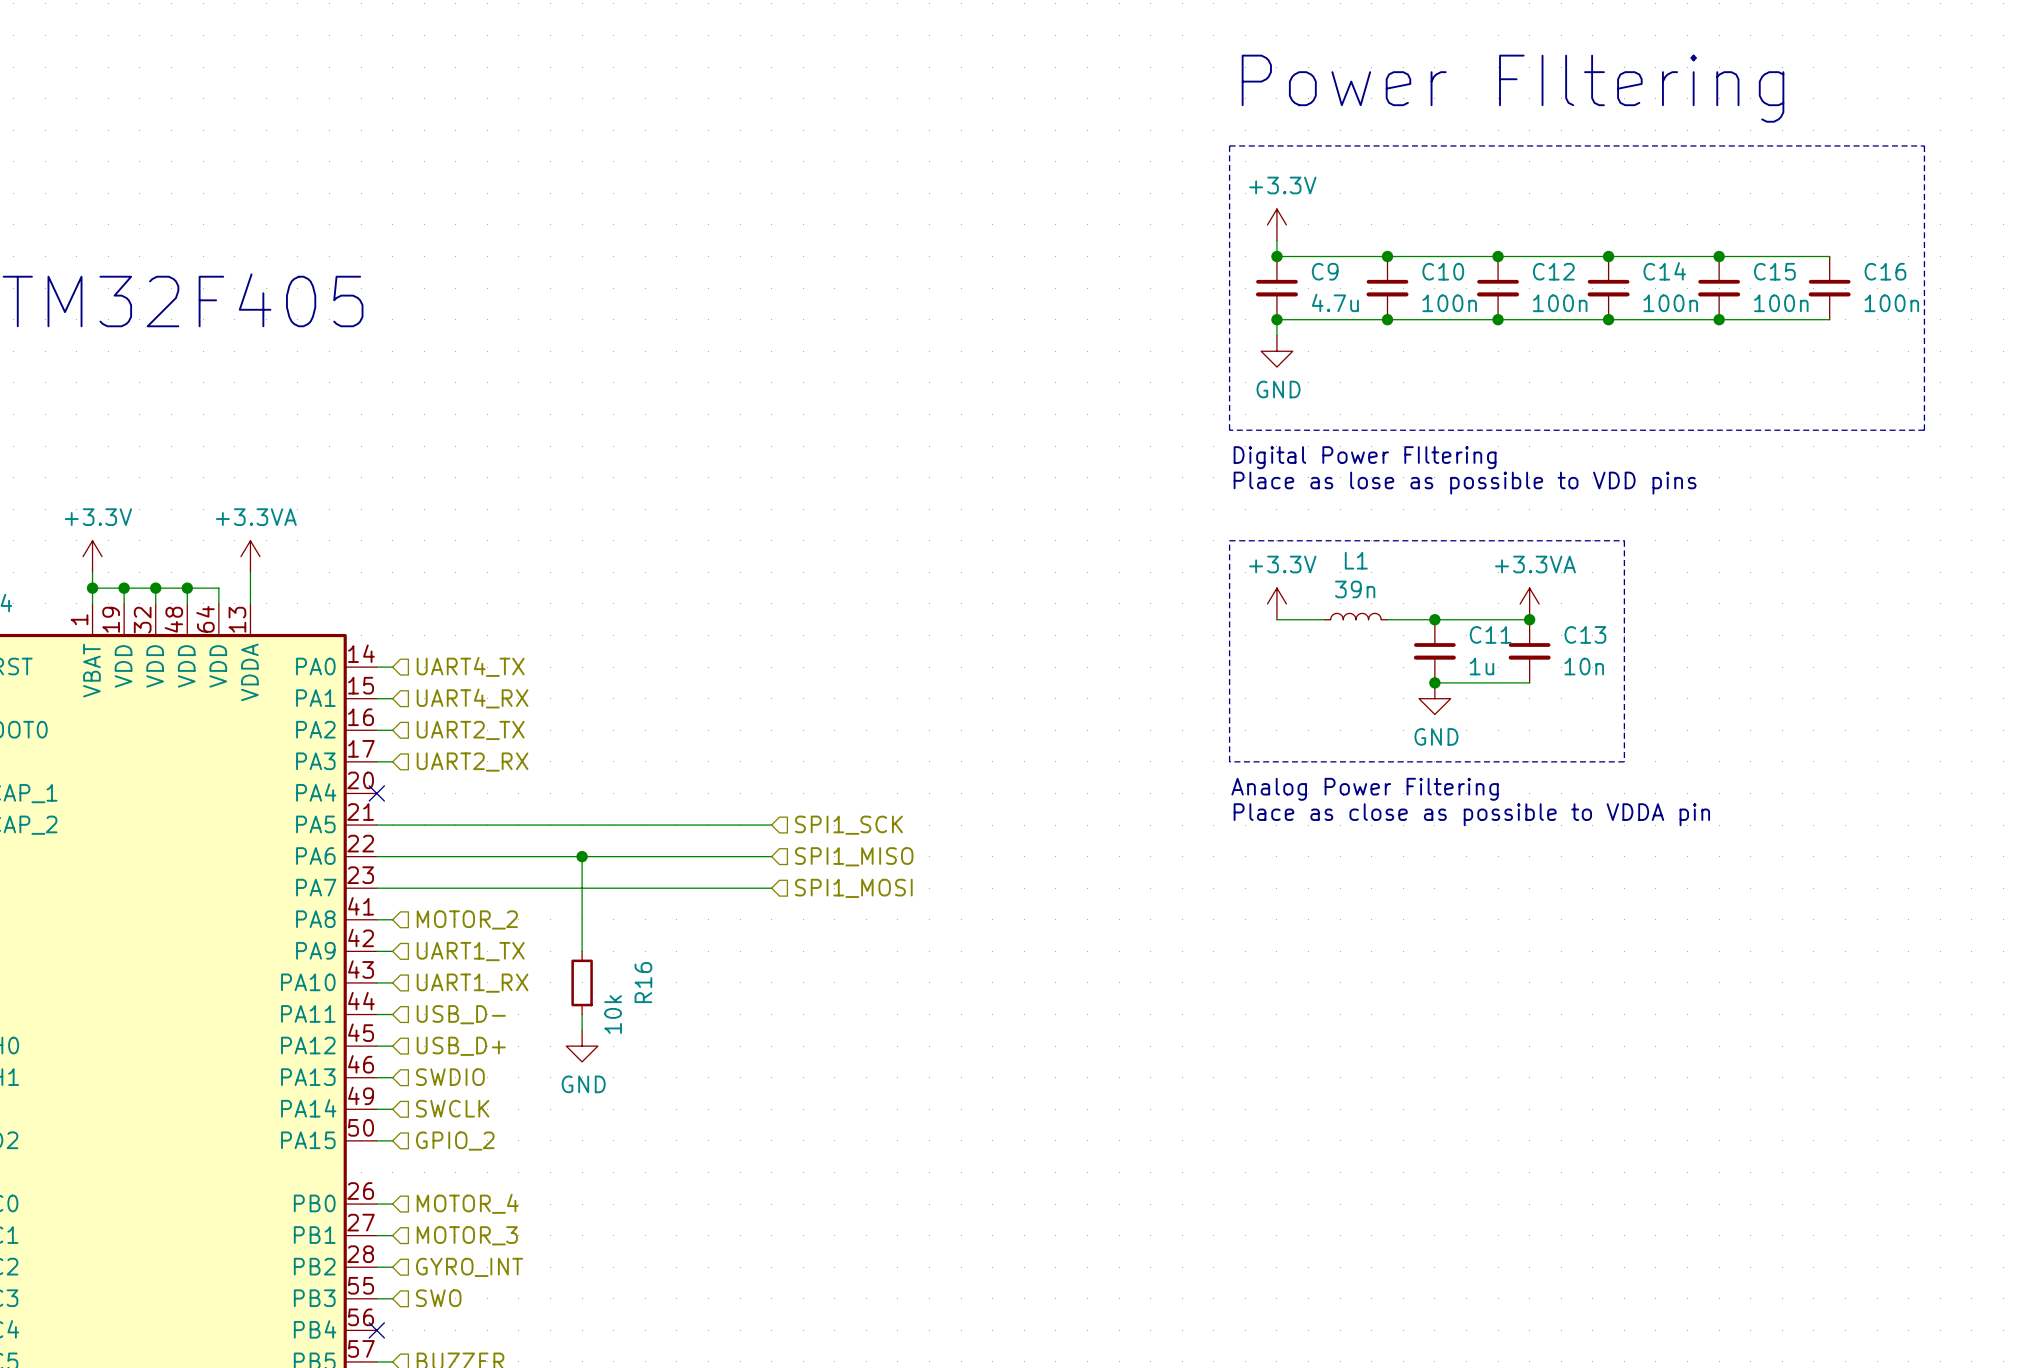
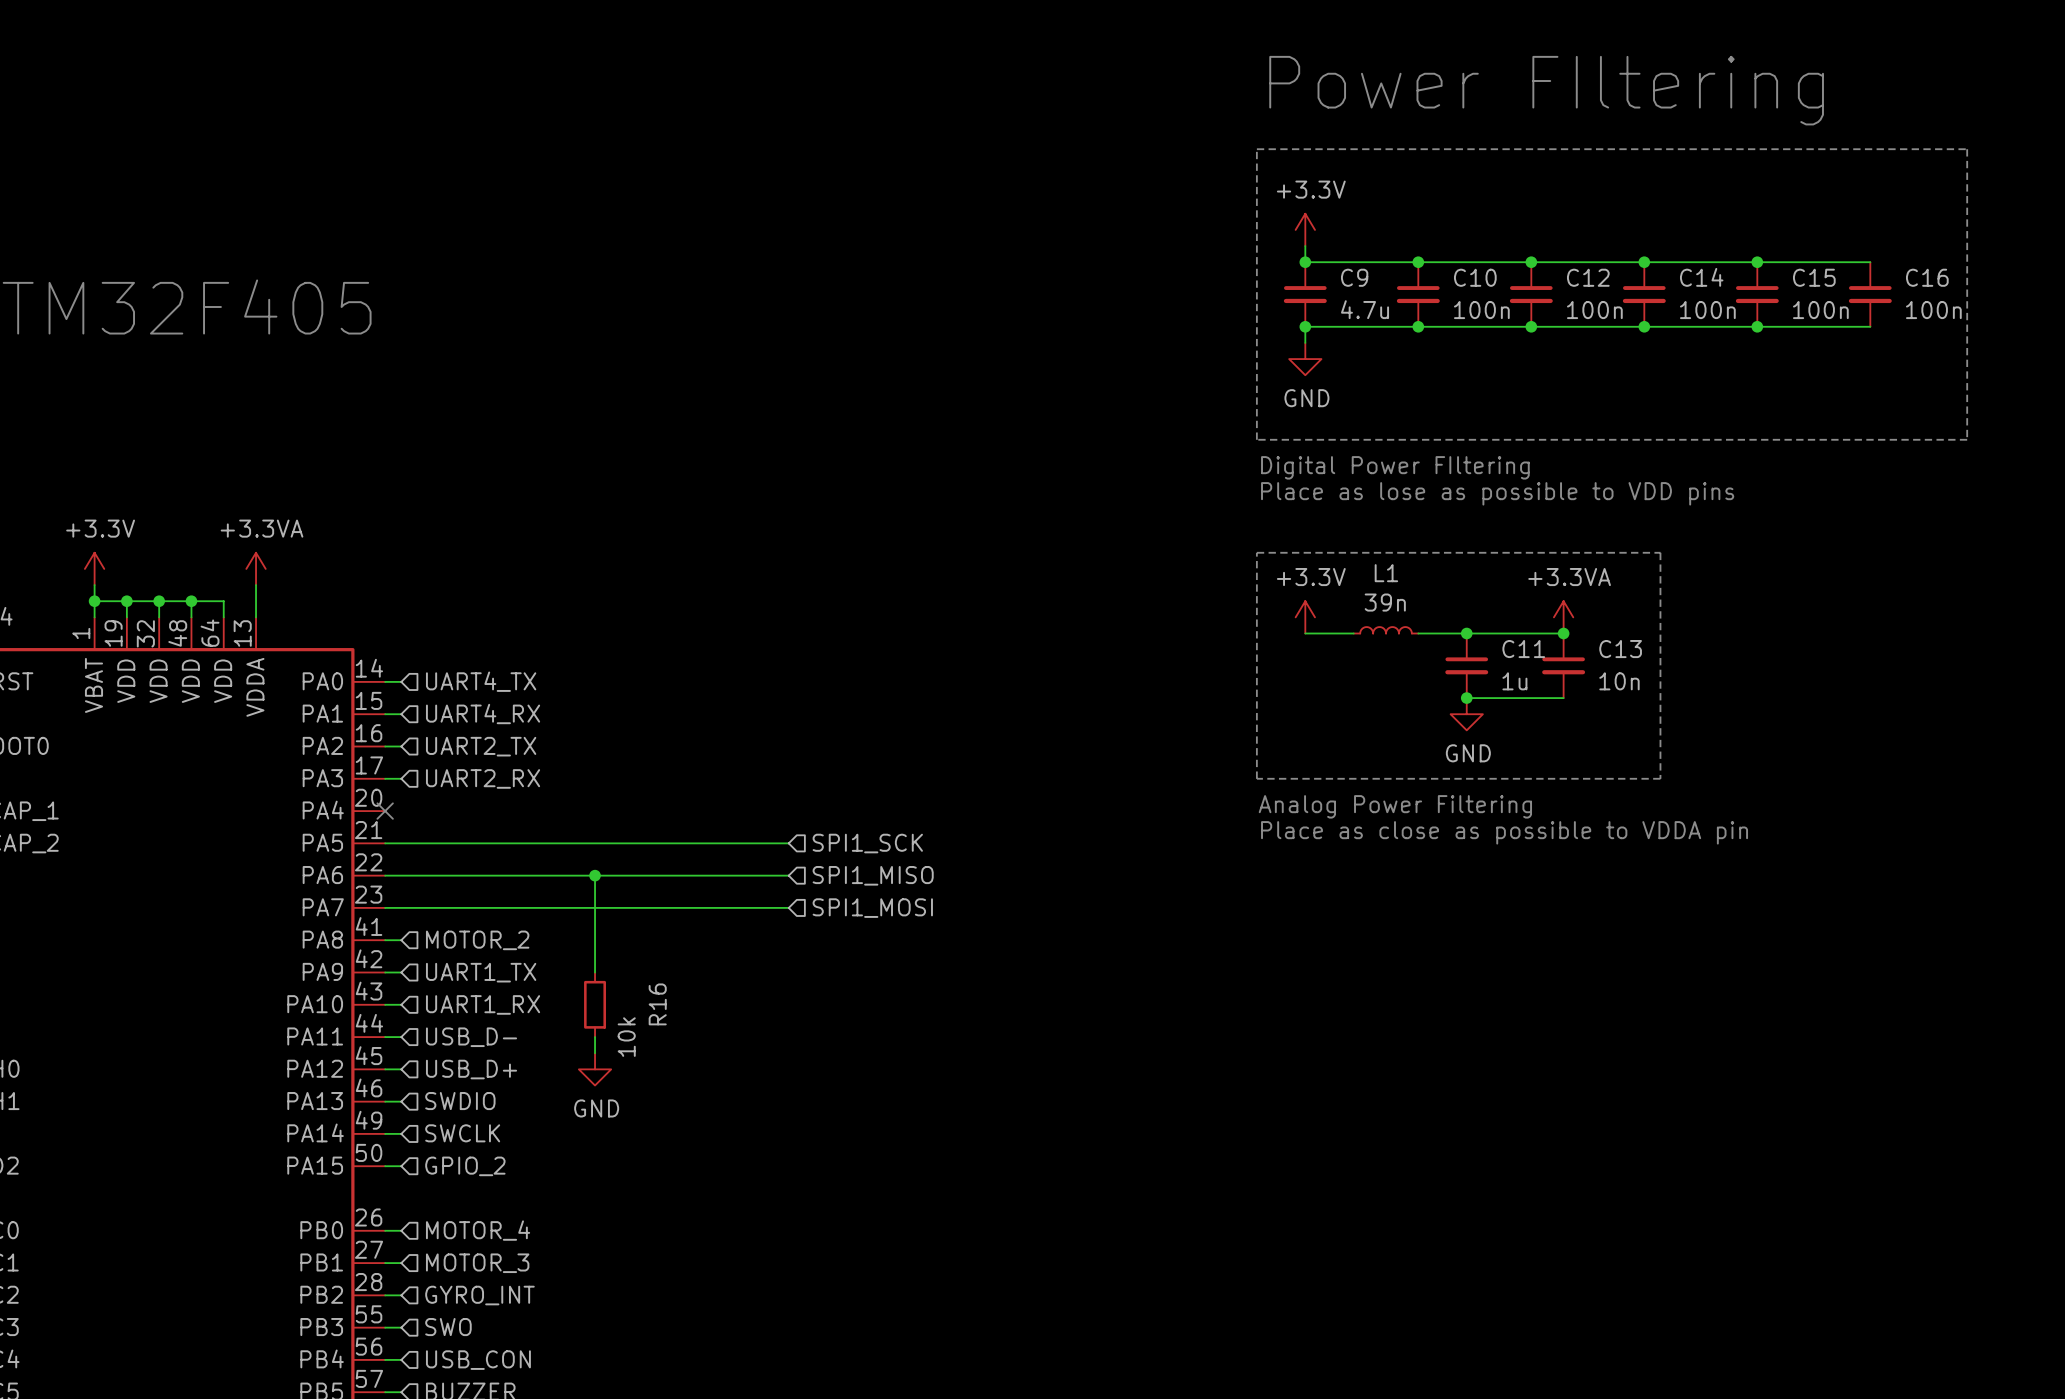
wire: none -> (385, 1359) (401, 1359)
no-connect mark: (376, 1330) -> none
hierarchical label: none -> USB_CON (478, 1360)

